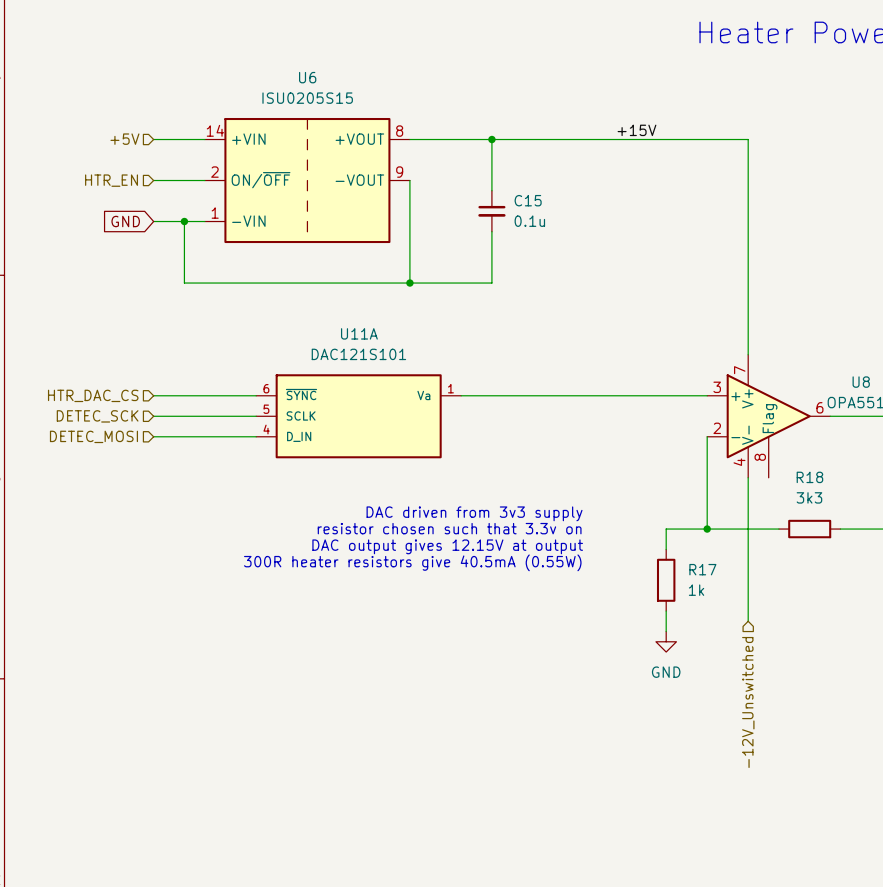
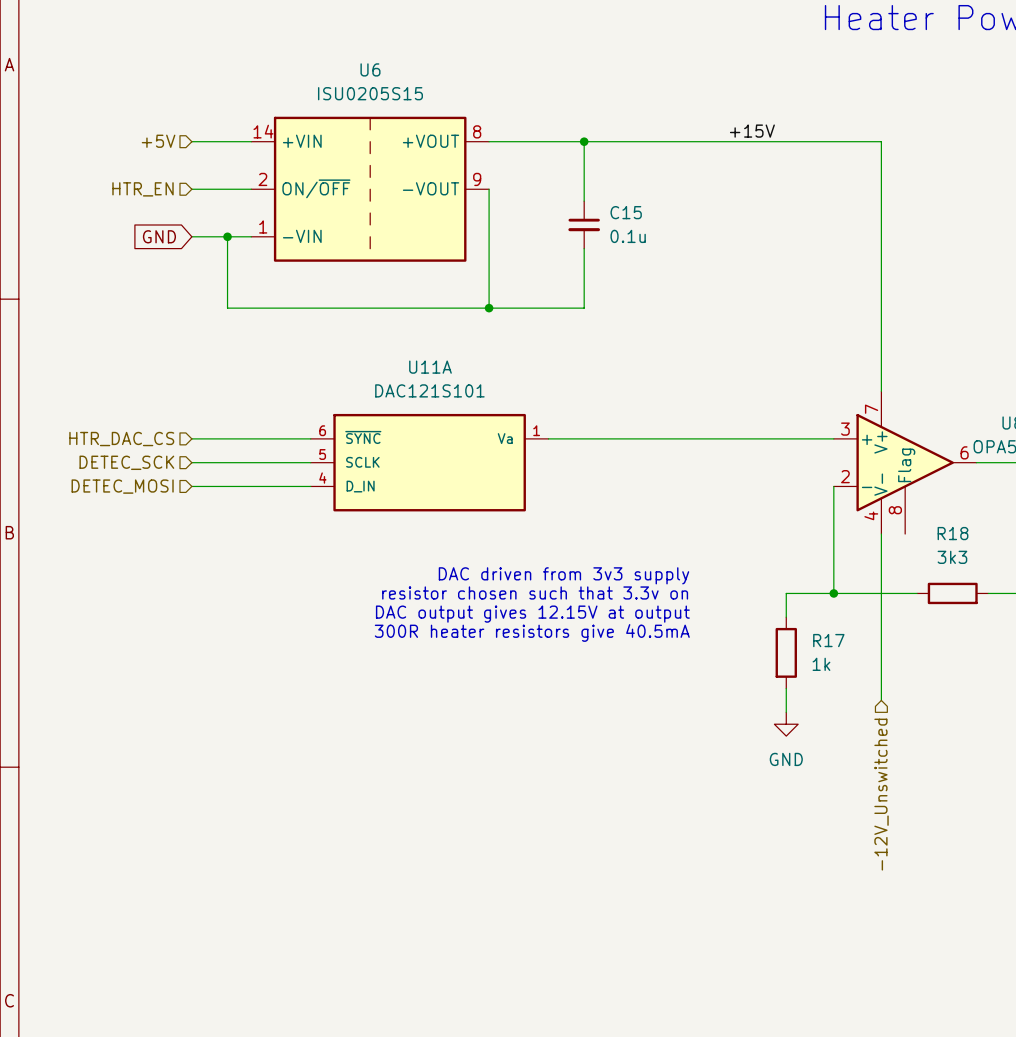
text: 300R heater resistors give 40.5mA (0.55W) (412, 562) -> 300R heater resistors give 40.5mA (532, 632)

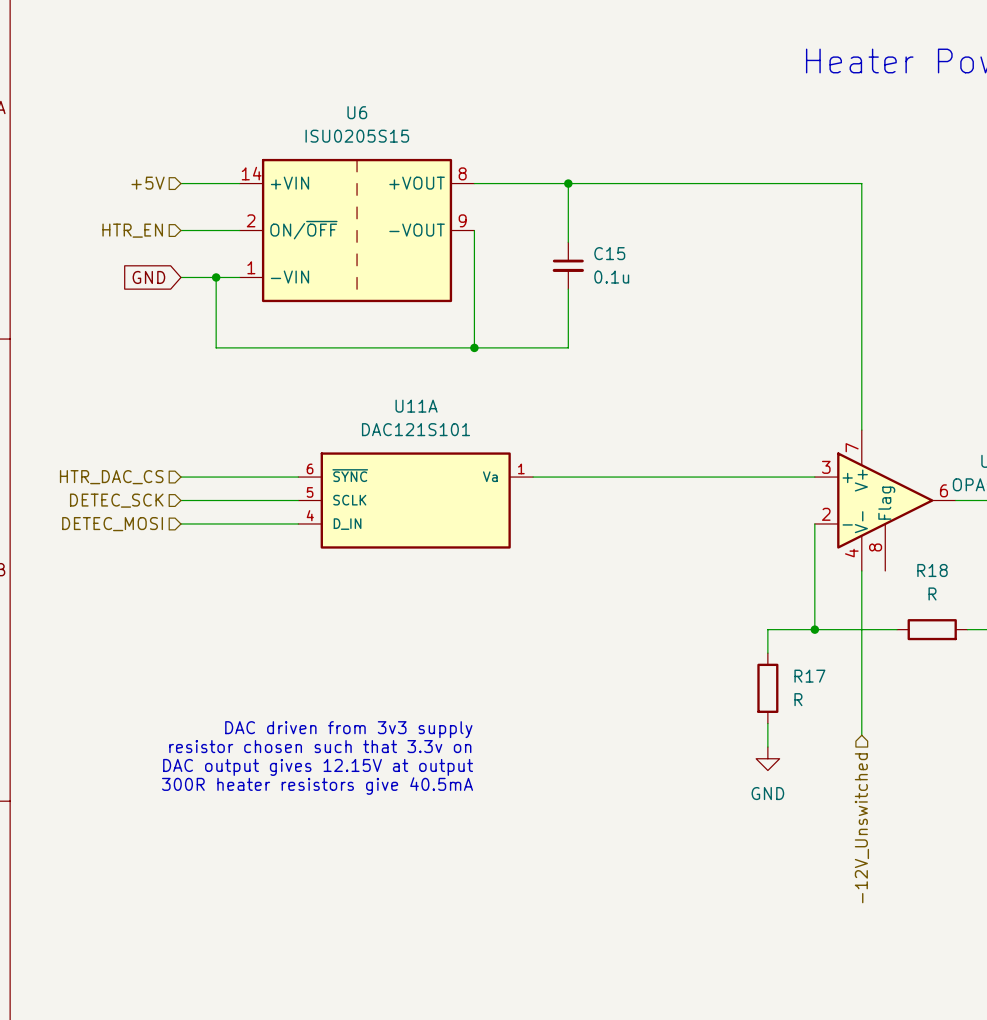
label: +15V (752, 131) -> none
R18 value: 3k3 (952, 557) -> R (932, 593)
text: DAC driven from 3v3 supply (563, 575) -> none
text: resistor chosen such that 3.3v on (535, 592) -> none
text: DAC output gives 12.15V at output (532, 614) -> none
text: 300R heater resistors give 40.5mA (532, 632) -> none
R17 value: 1k (821, 664) -> R (798, 699)
text: none -> DAC driven from 3v3 supply (348, 729)
text: none -> resistor chosen such that 3.3v on (320, 746)
text: none -> DAC output gives 12.15V at output (318, 767)
text: none -> 300R heater resistors give 40.5mA (317, 786)

